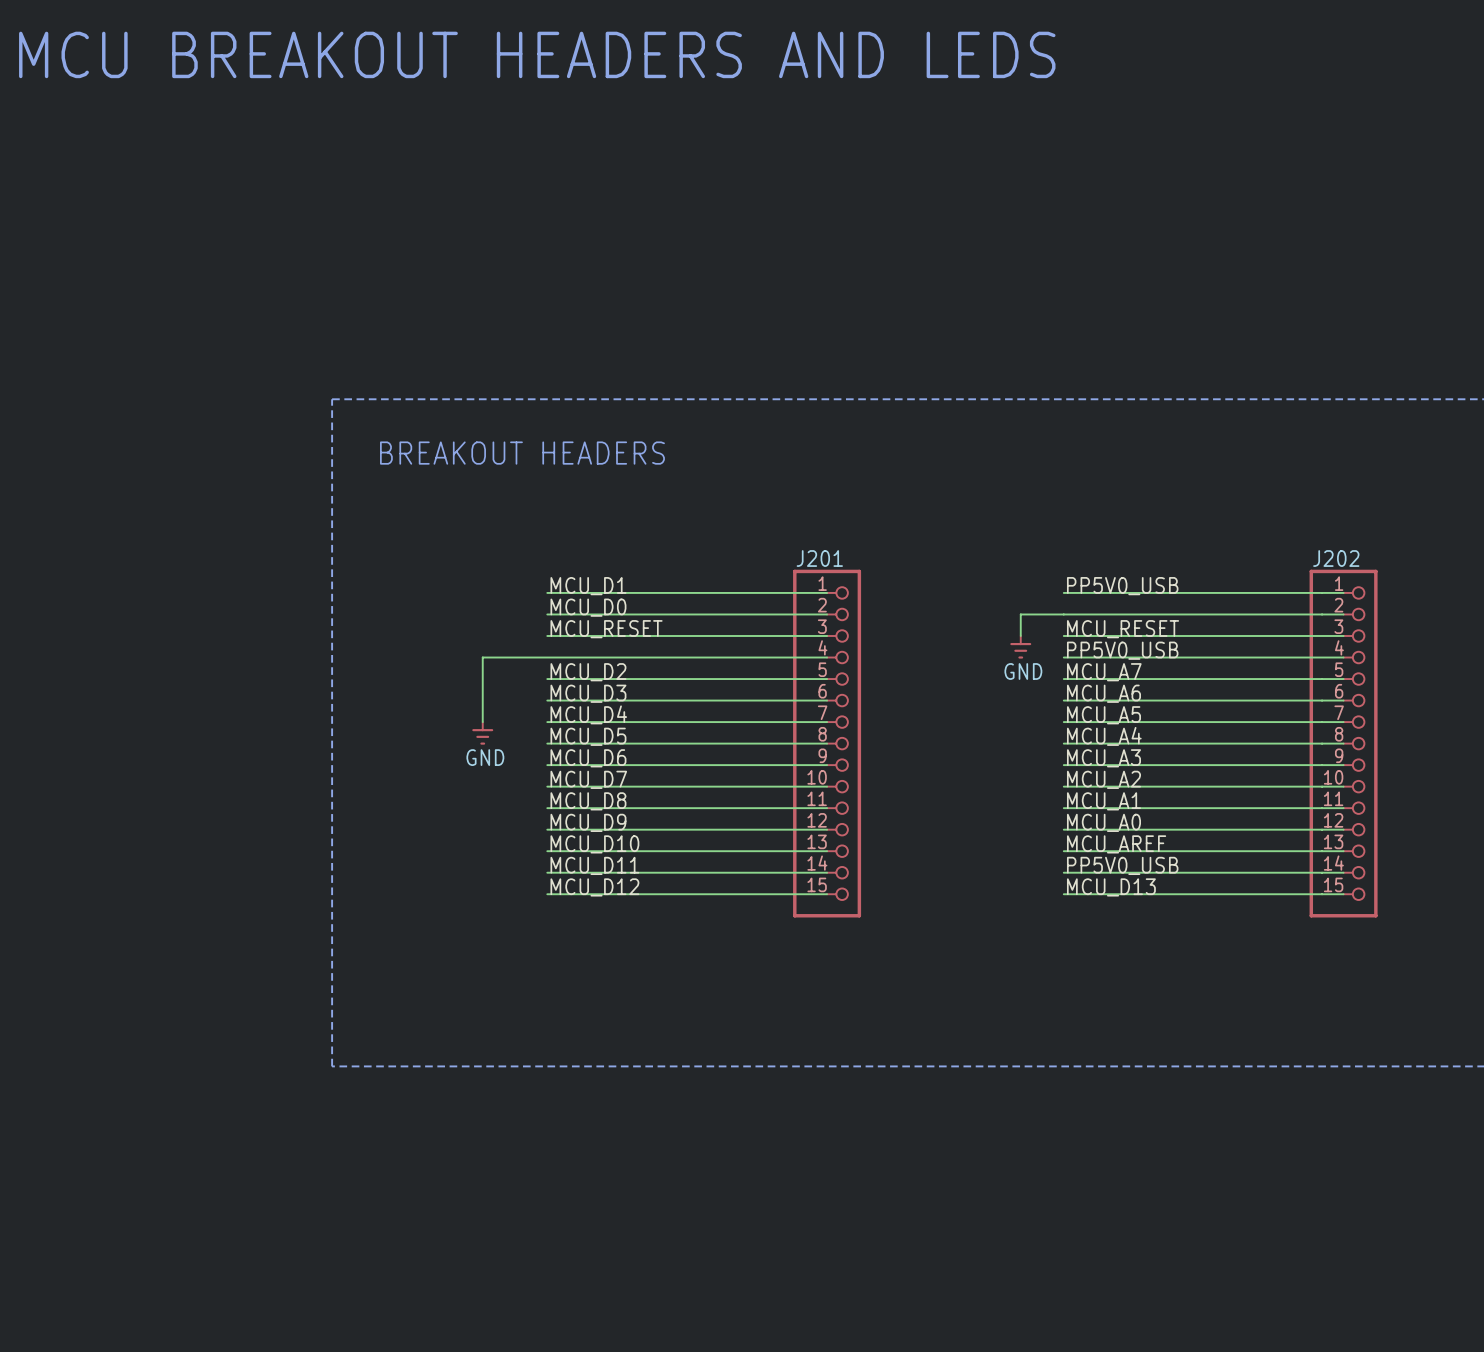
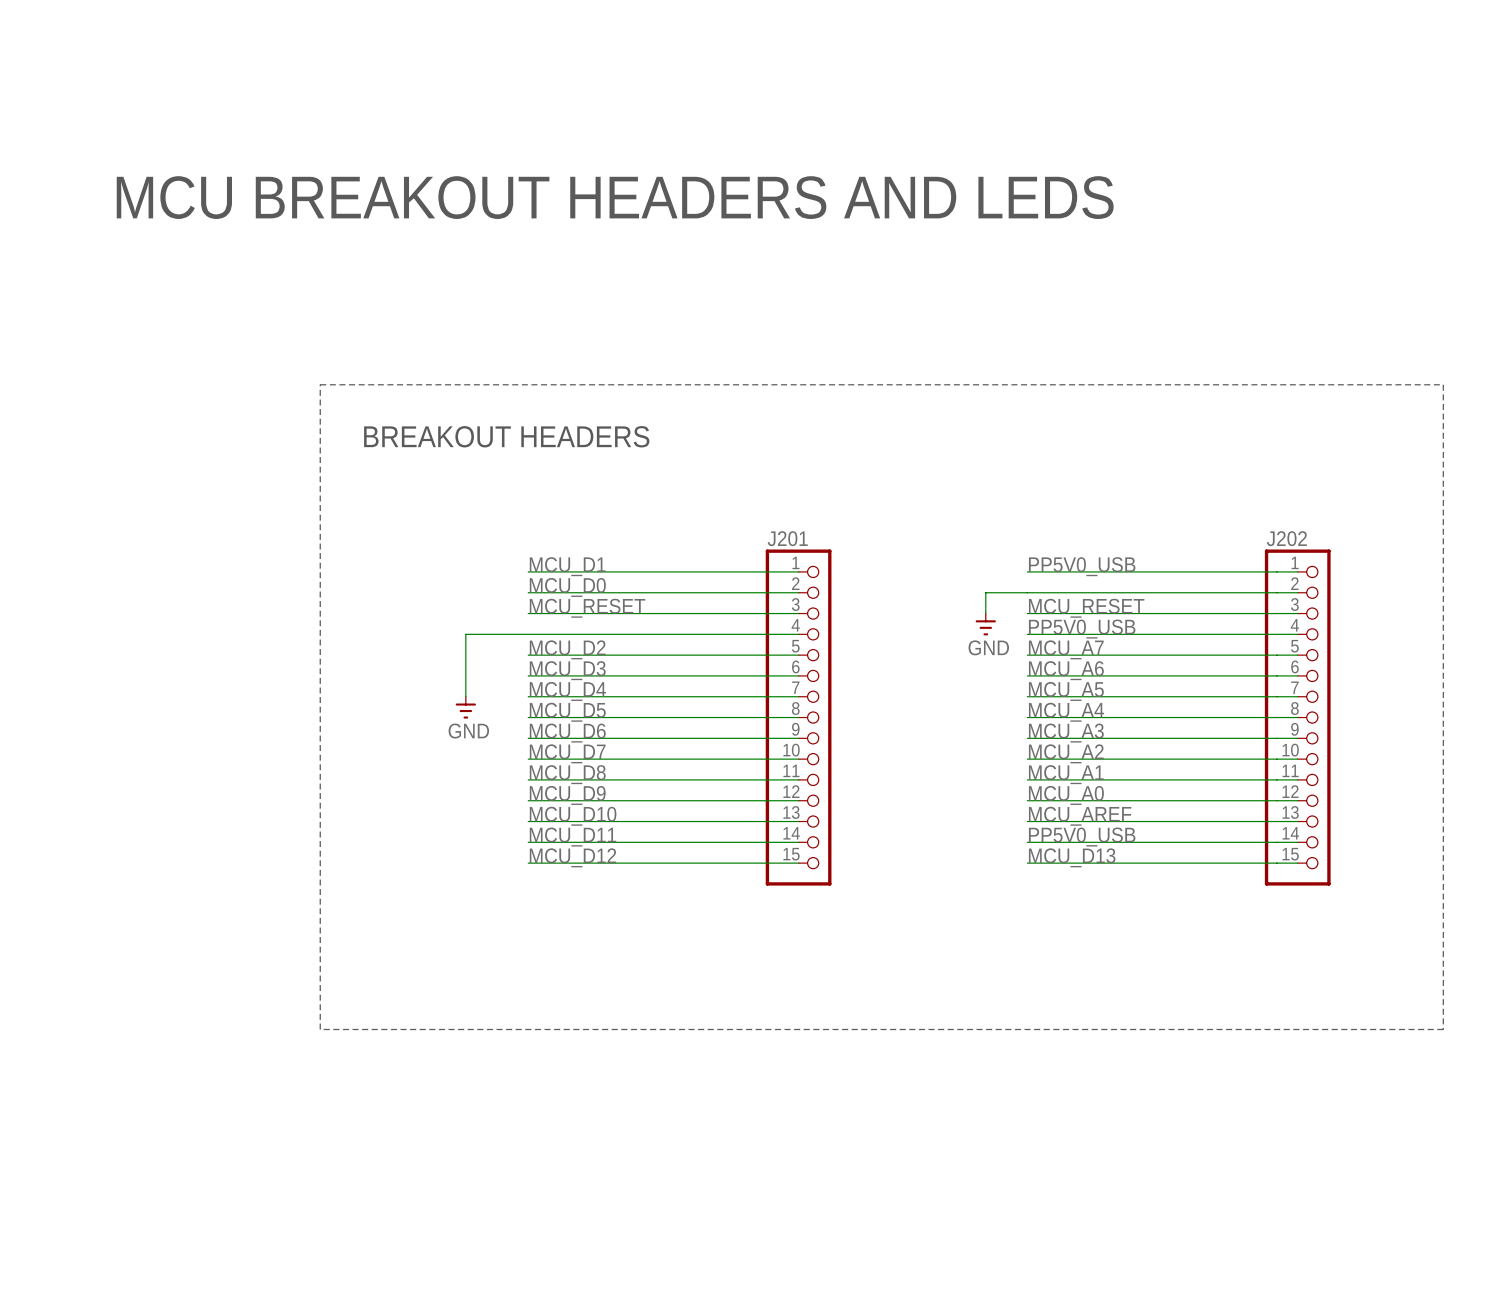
text position: MCU BREAKOUT HEADERS AND LEDS (537, 54) -> MCU BREAKOUT HEADERS AND LEDS (615, 197)

